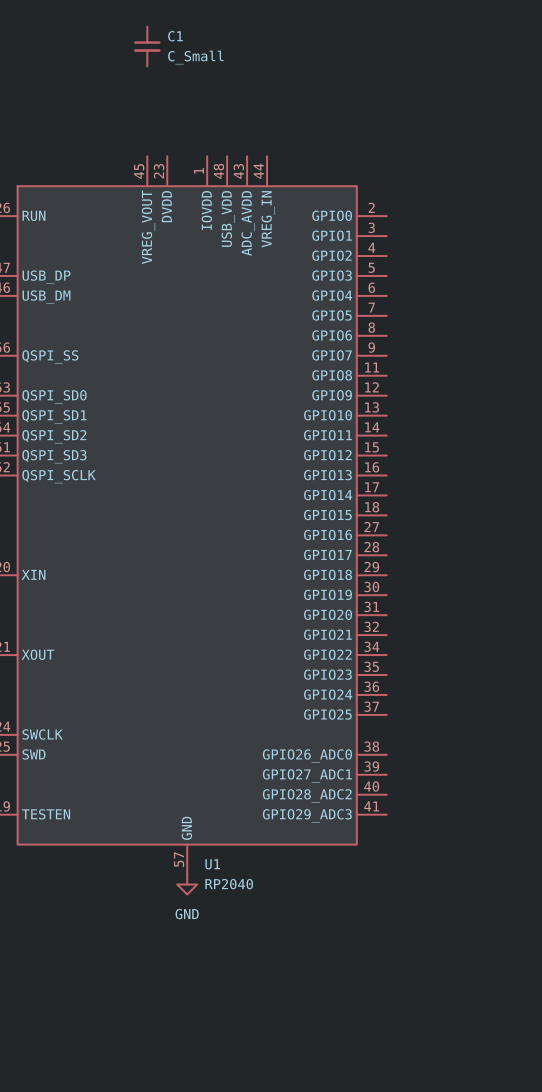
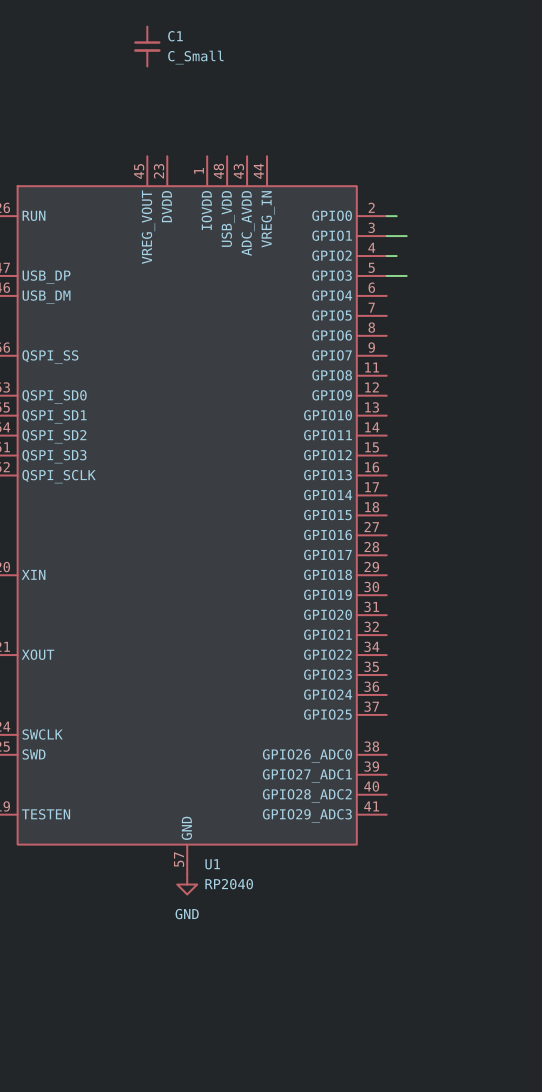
wire: none -> (386, 216) (396, 216)
wire: none -> (386, 236) (406, 236)
wire: none -> (386, 256) (396, 256)
wire: none -> (386, 275) (406, 275)

